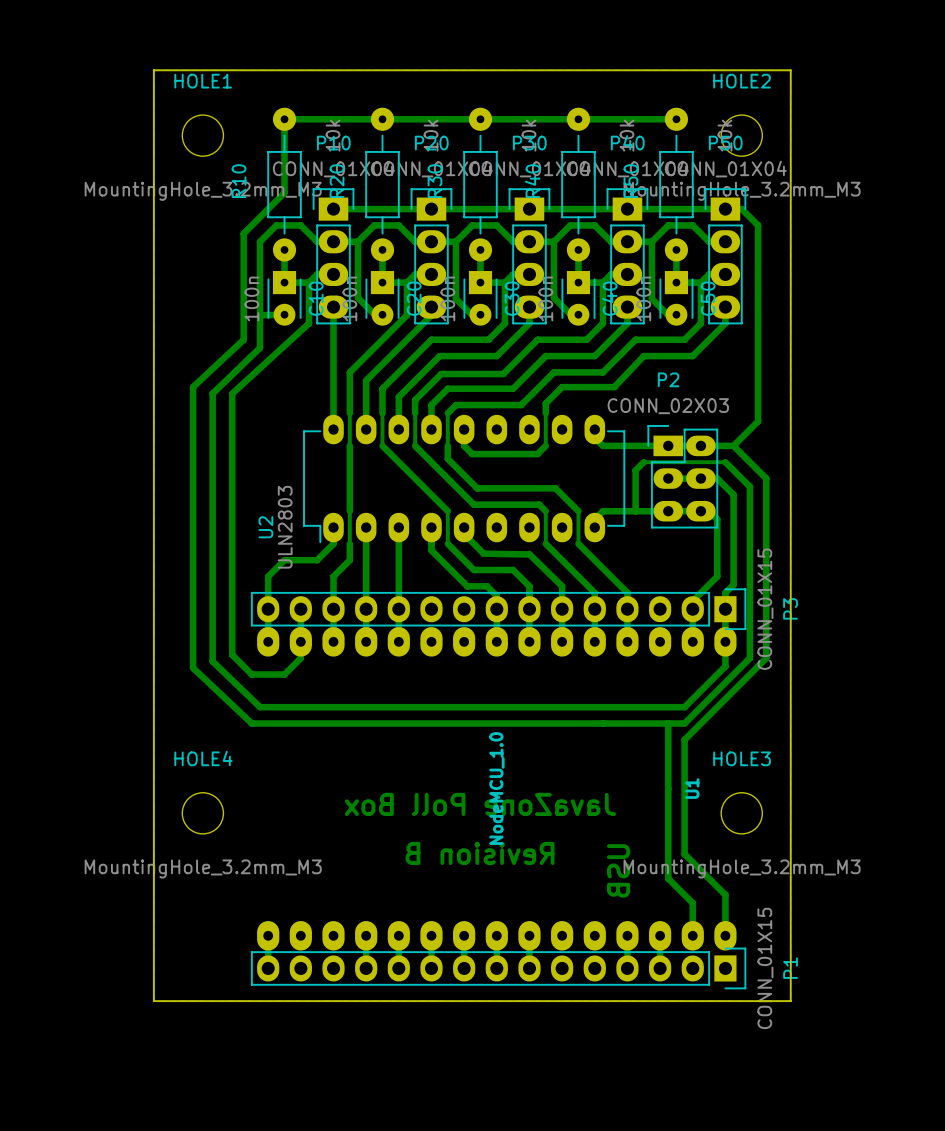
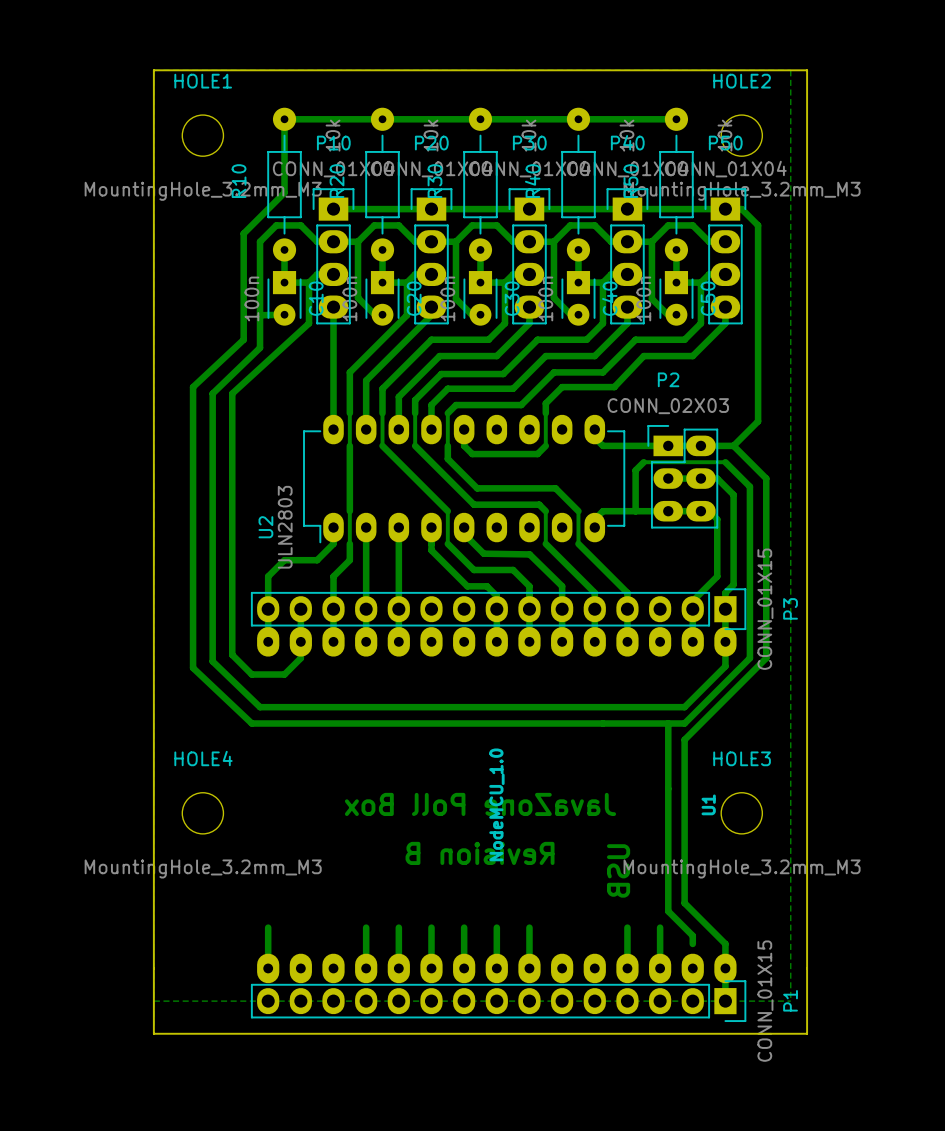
board edge: (790, 70) (790, 1001) (153, 1001) -> (790, 70) (807, 70) (807, 1033) (153, 1033) (153, 1001)
U1 footprint: [257, 627, 737, 951] -> [257, 627, 737, 984]
bottom track: (684, 854) (725, 894) (725, 935) -> (684, 854) (684, 903) (725, 943) (725, 1001)
bottom track: (668, 878) (692, 903) (692, 935) -> (668, 878) (668, 911) (692, 935)
P1 position: (498, 968) -> (498, 1001)

